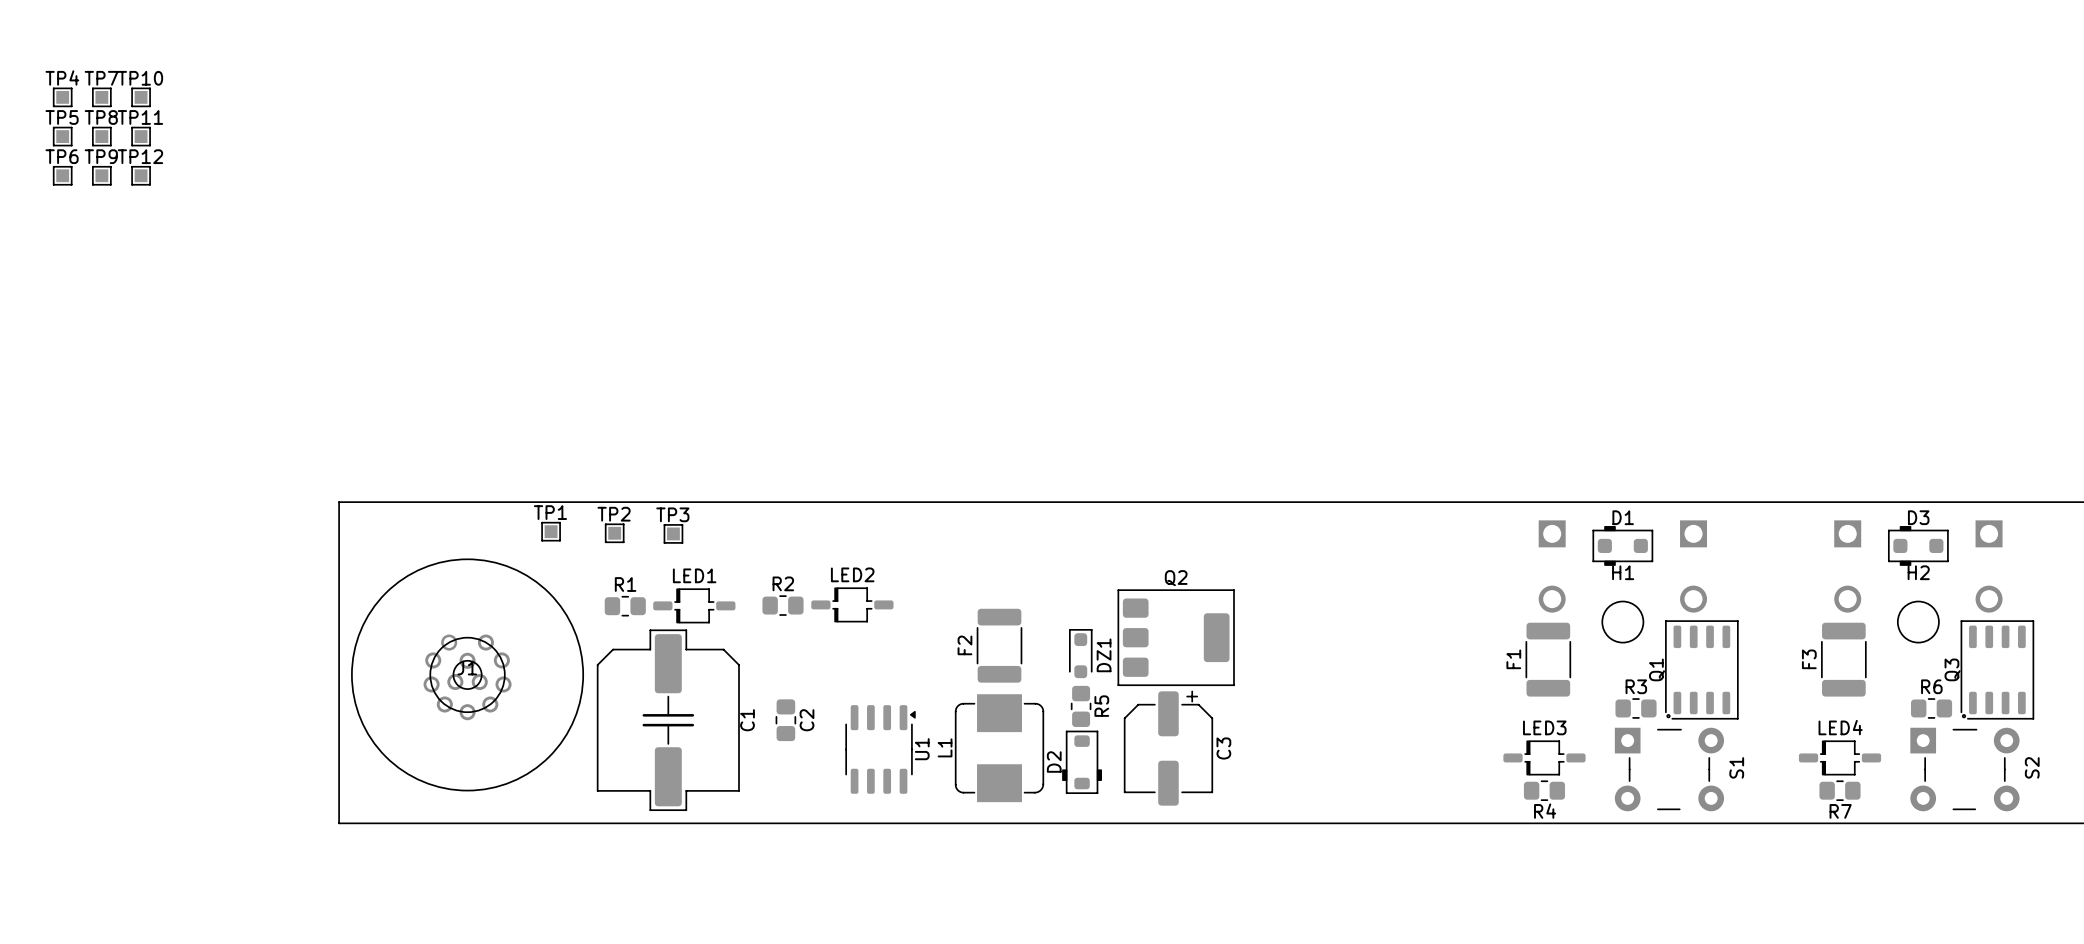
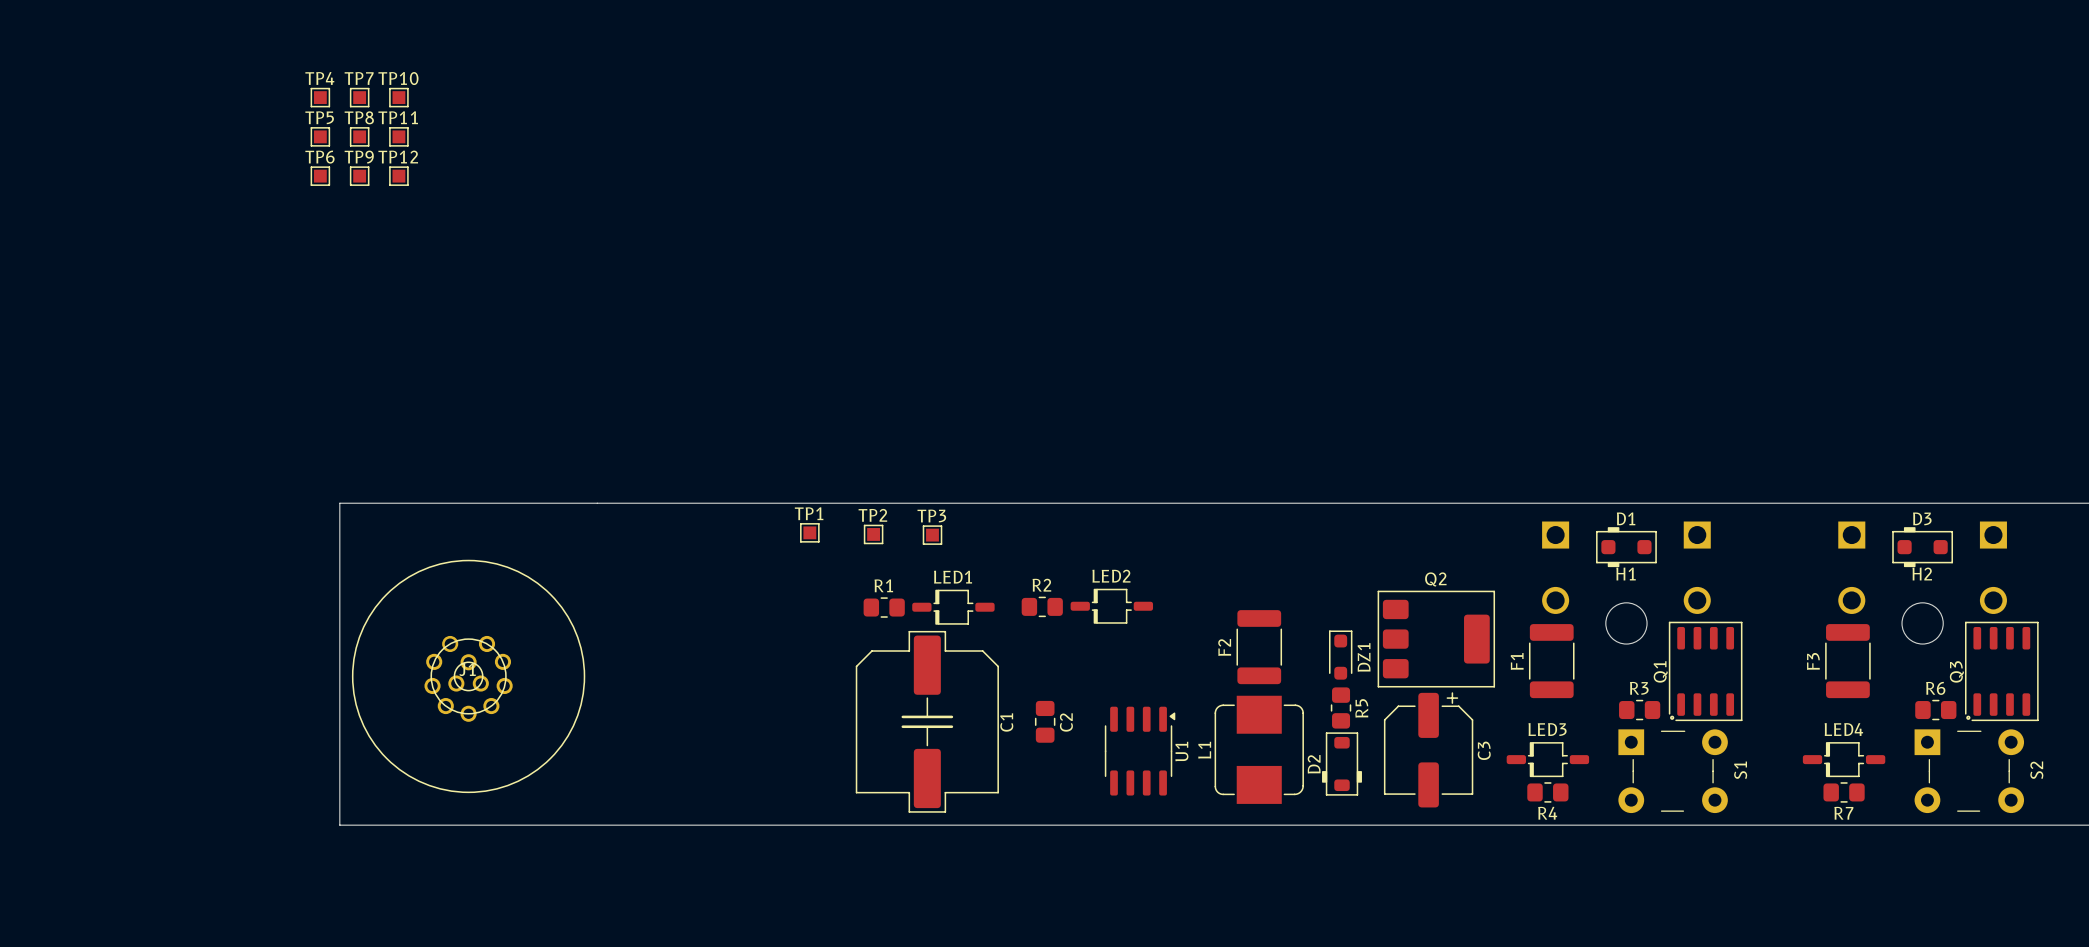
TP4 position: (62, 97) -> (320, 97)
TP7 position: (101, 97) -> (359, 97)
TP10 position: (141, 97) -> (398, 97)
TP5 position: (62, 136) -> (320, 136)
TP8 position: (101, 136) -> (359, 136)
TP11 position: (141, 136) -> (398, 136)
TP6 position: (62, 175) -> (320, 176)
TP9 position: (101, 175) -> (359, 176)
TP12 position: (141, 175) -> (398, 176)
TP1 position: (551, 531) -> (809, 532)
TP2 position: (614, 533) -> (873, 534)
TP3 position: (673, 533) -> (932, 535)
LED2 position: (852, 604) -> (1111, 606)
LED1 position: (694, 605) -> (953, 607)
R2 position: (783, 605) -> (1042, 606)
R1 position: (625, 606) -> (884, 607)
Q2 position: (1176, 637) -> (1436, 639)
F2 position: (999, 645) -> (1259, 647)
DZ1 position: (1080, 653) -> (1340, 655)
R5 position: (1081, 706) -> (1341, 707)
C1 position: (668, 720) -> (927, 721)
C2 position: (785, 720) -> (1045, 721)
L1 position: (999, 748) -> (1259, 749)
C3 position: (1168, 748) -> (1428, 749)
U1 position: (880, 749) -> (1140, 751)
D2 position: (1082, 762) -> (1342, 764)

